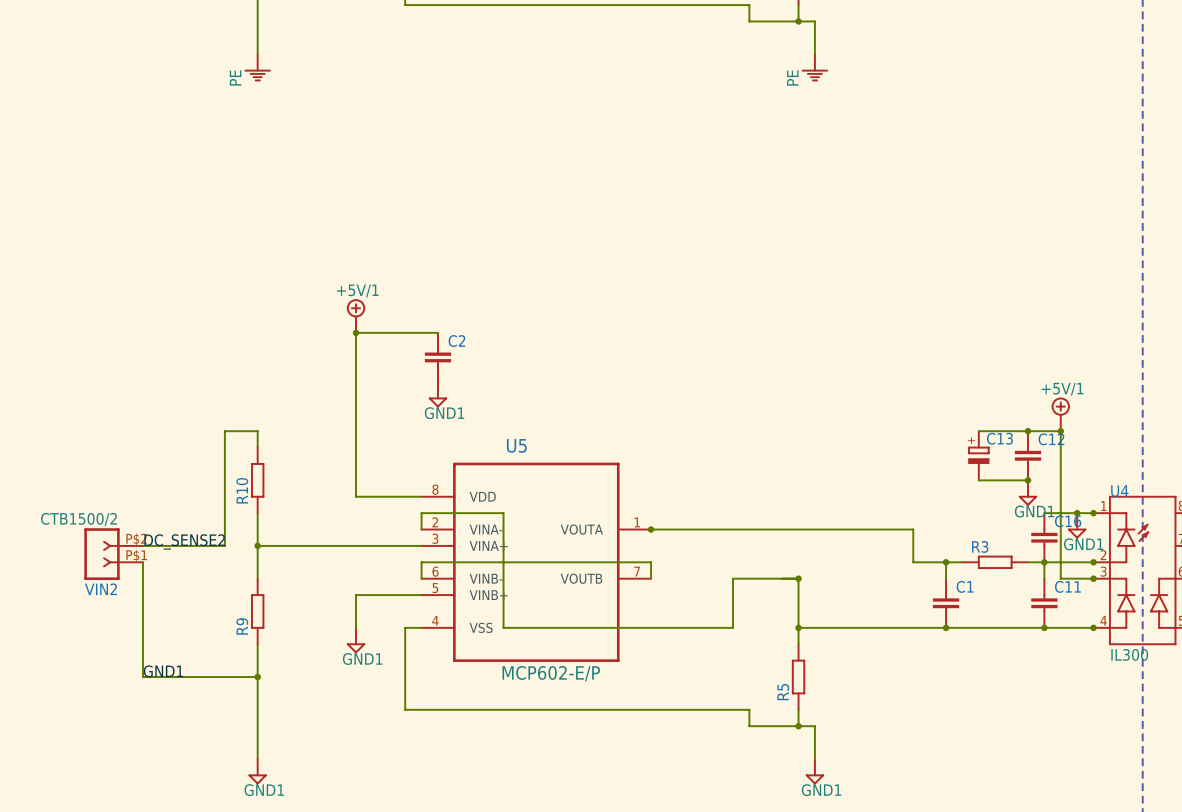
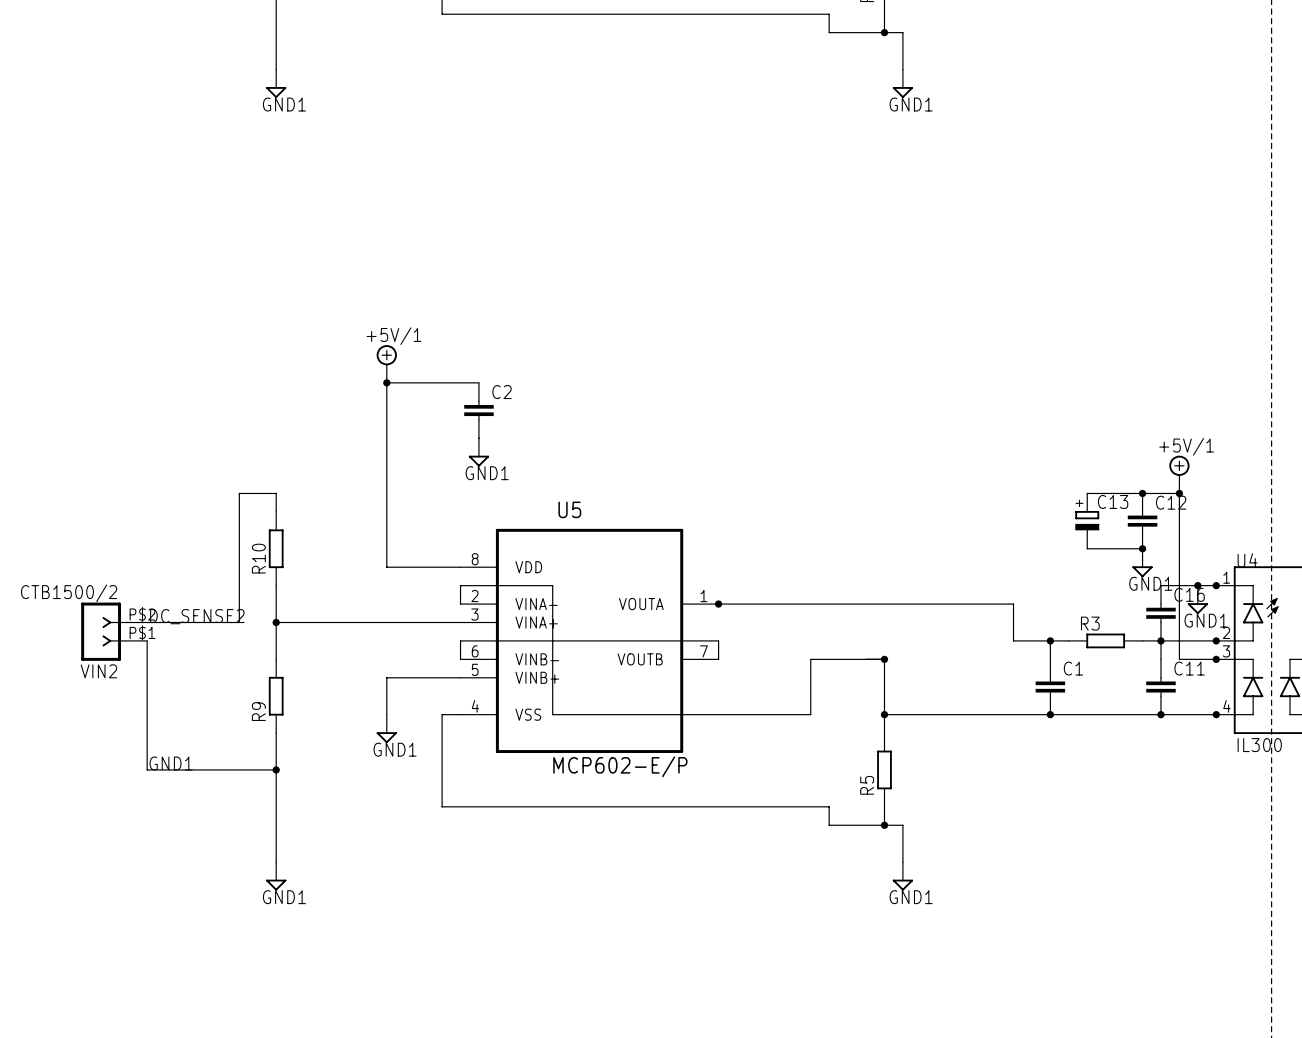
power symbol: PE (257, 67) -> GND1 (276, 83)
power symbol: PE (814, 67) -> GND1 (902, 83)

